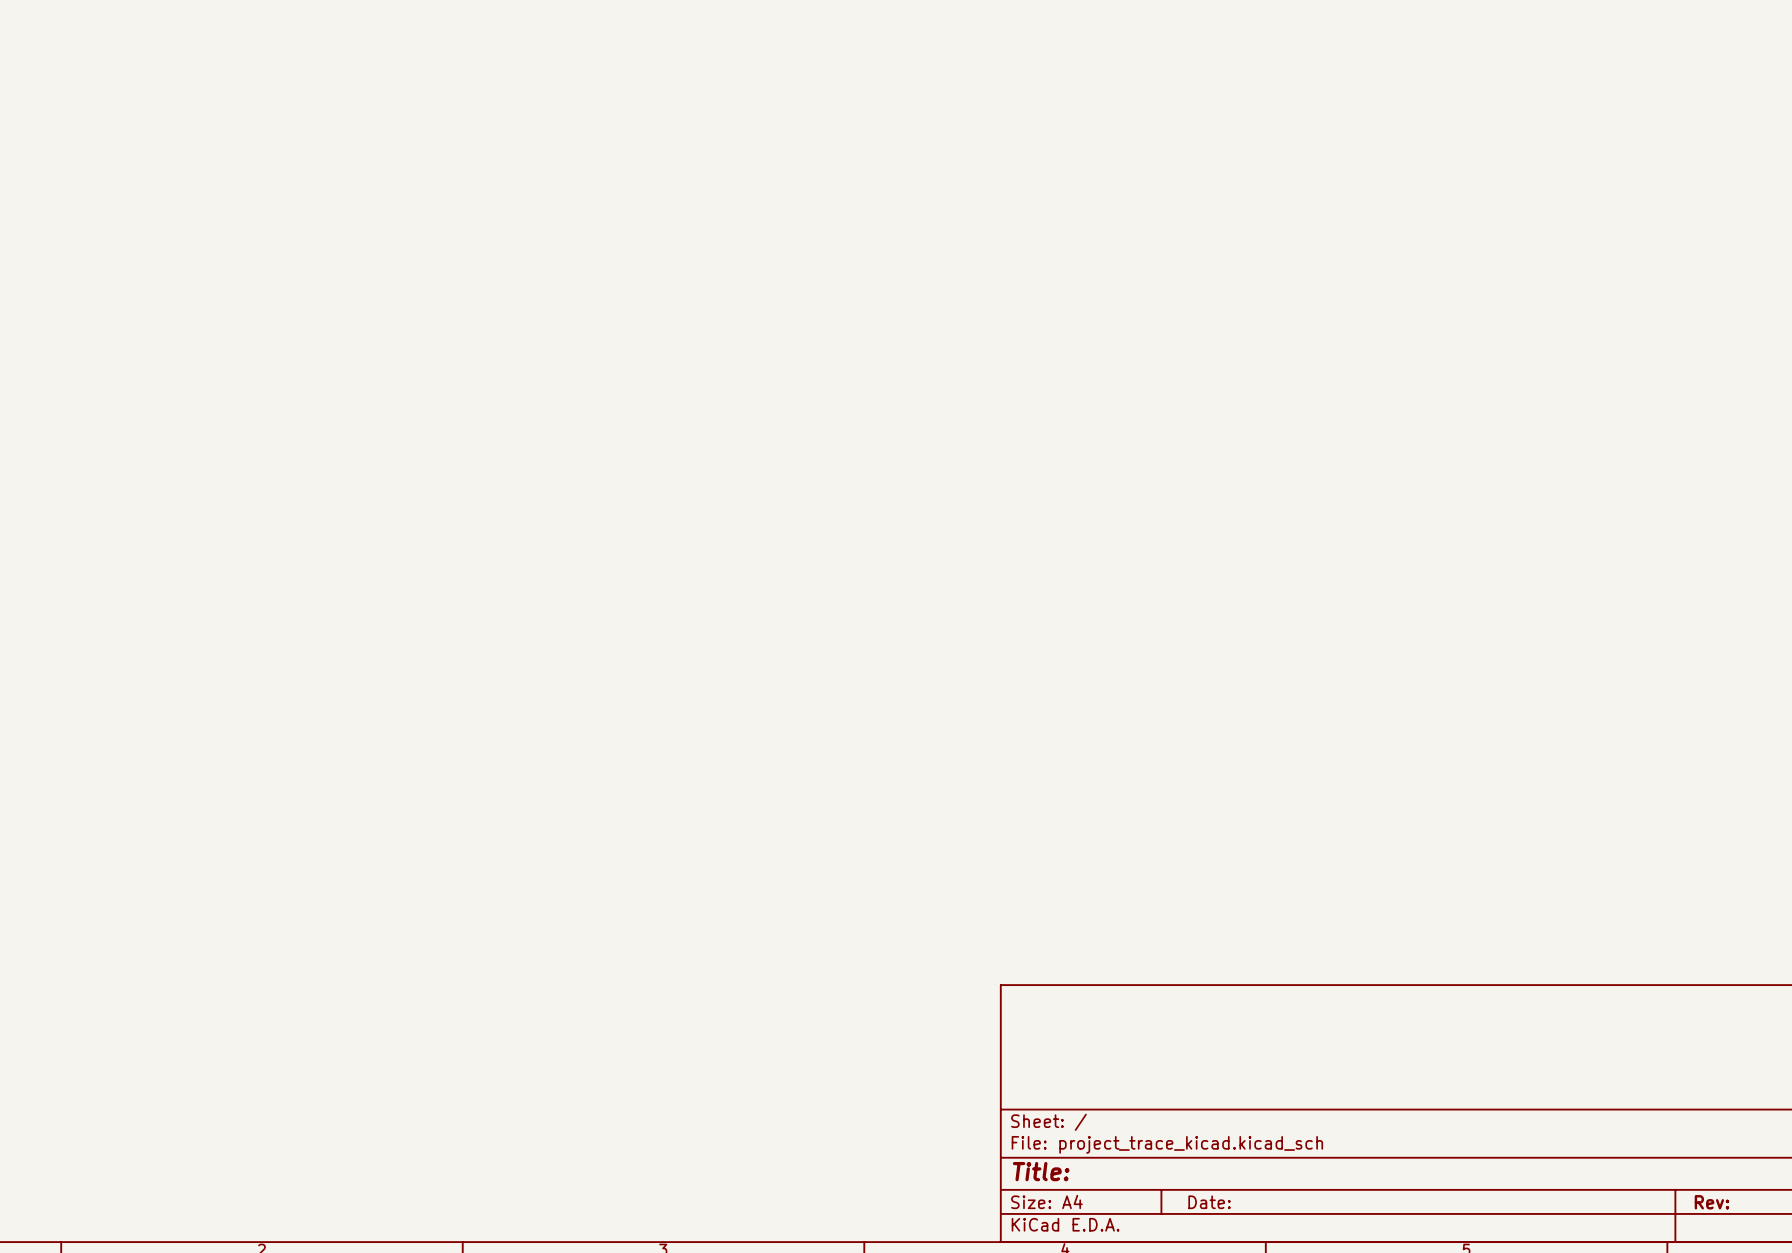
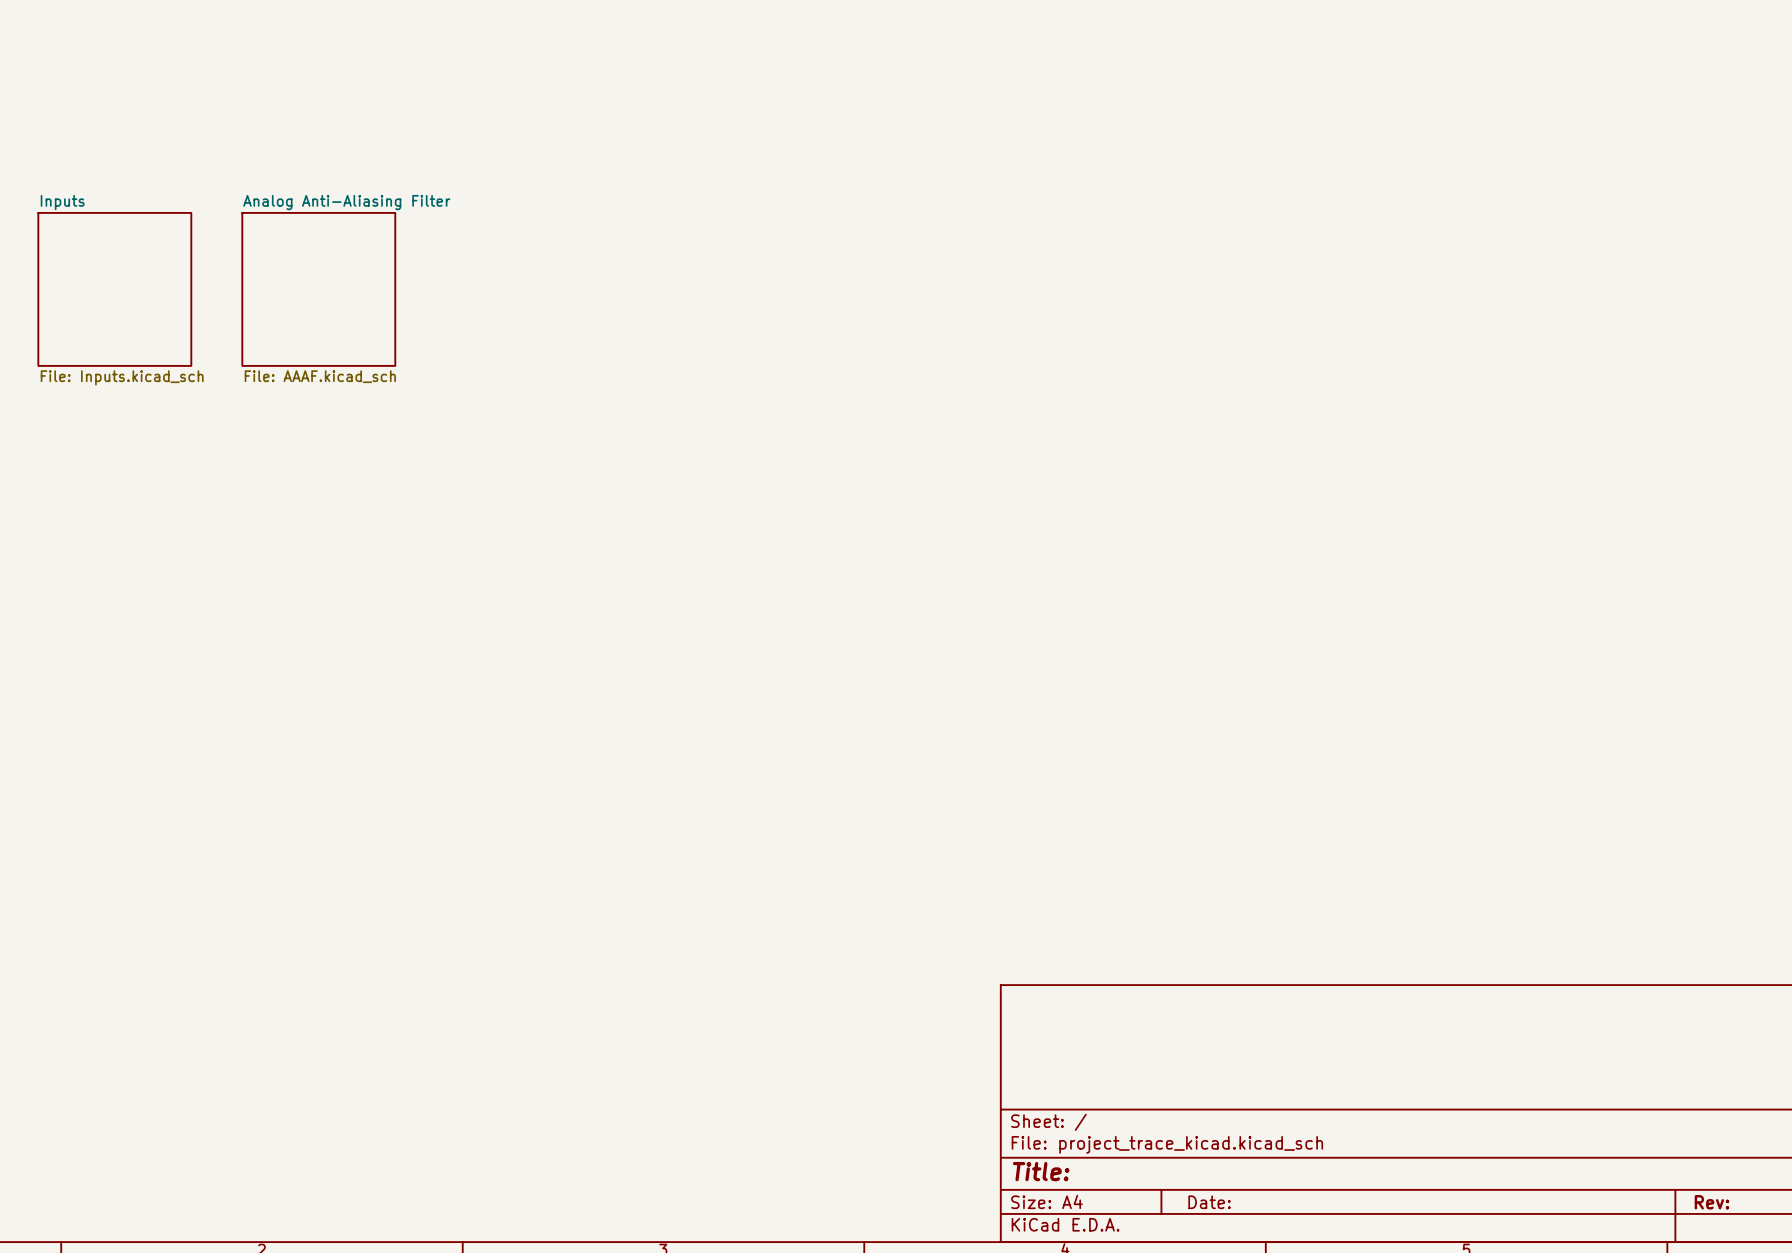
sheet Inputs: none -> File: Inputs.kicad_sch (114, 289)
sheet Analog Anti-Aliasing Filter: none -> File: AAAF.kicad_sch (318, 289)

